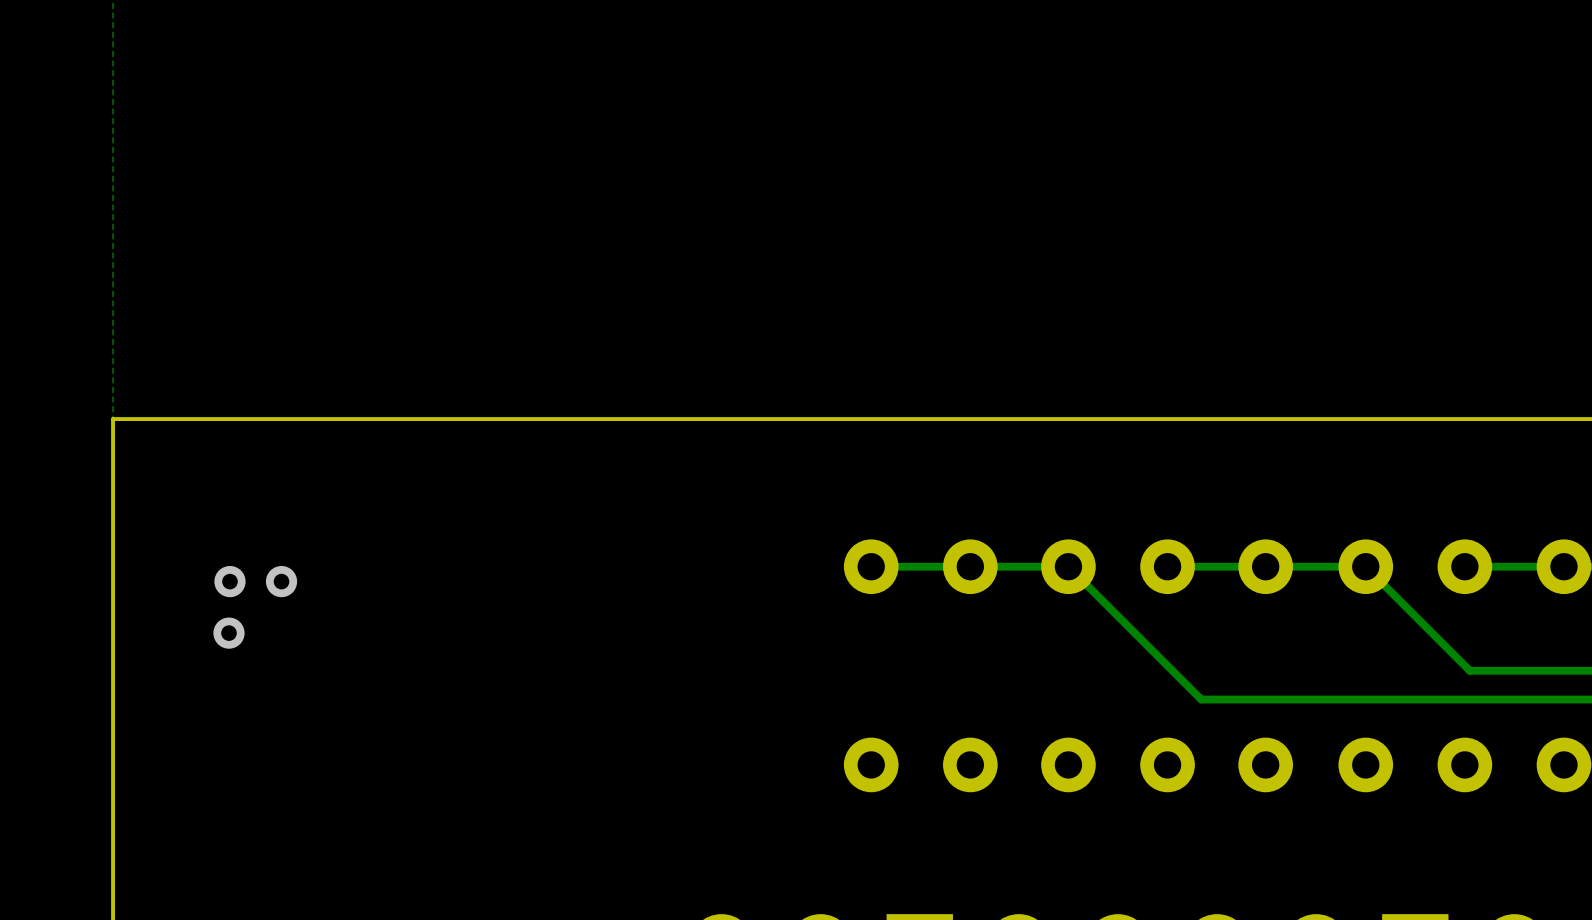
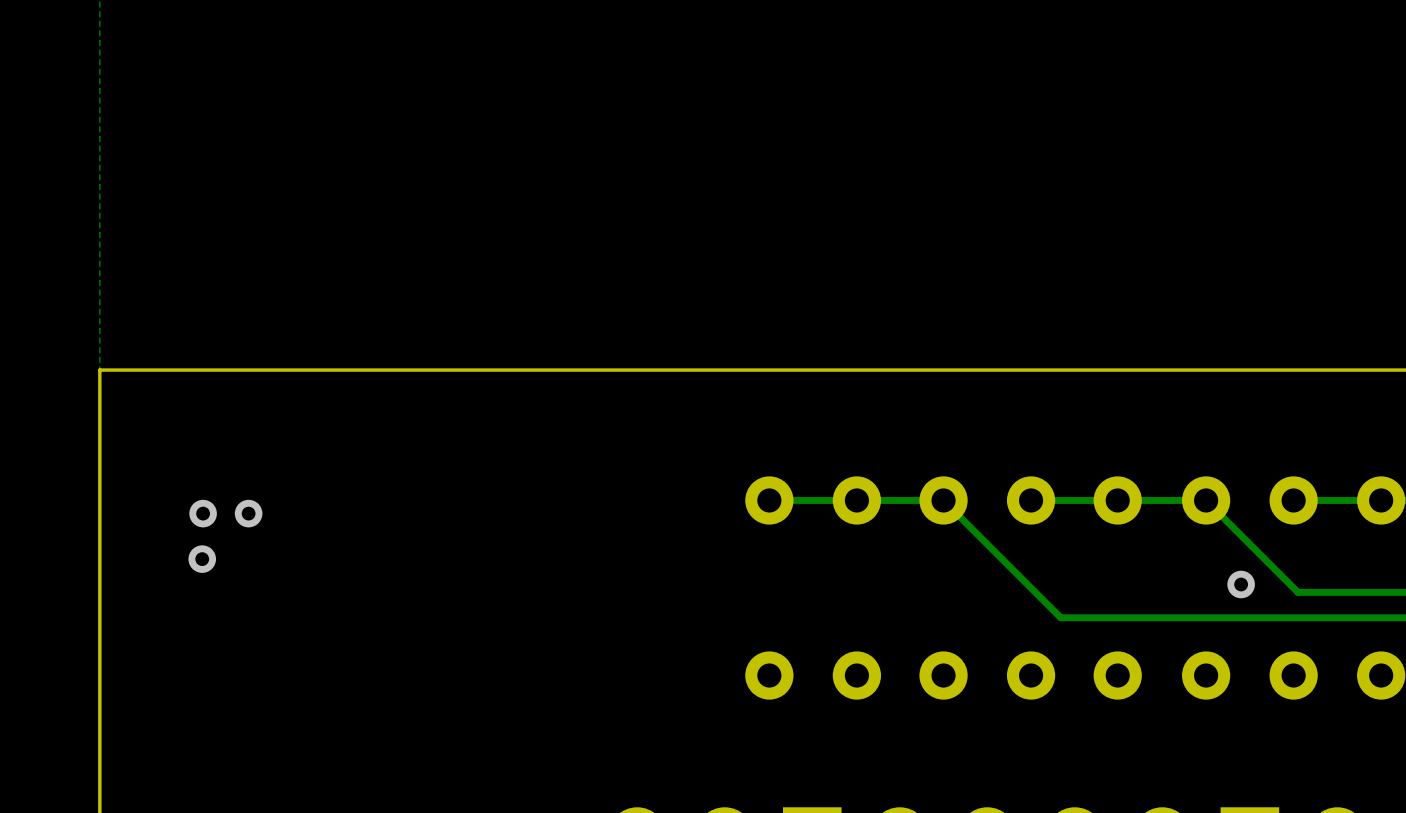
via: none -> (1241, 584)

